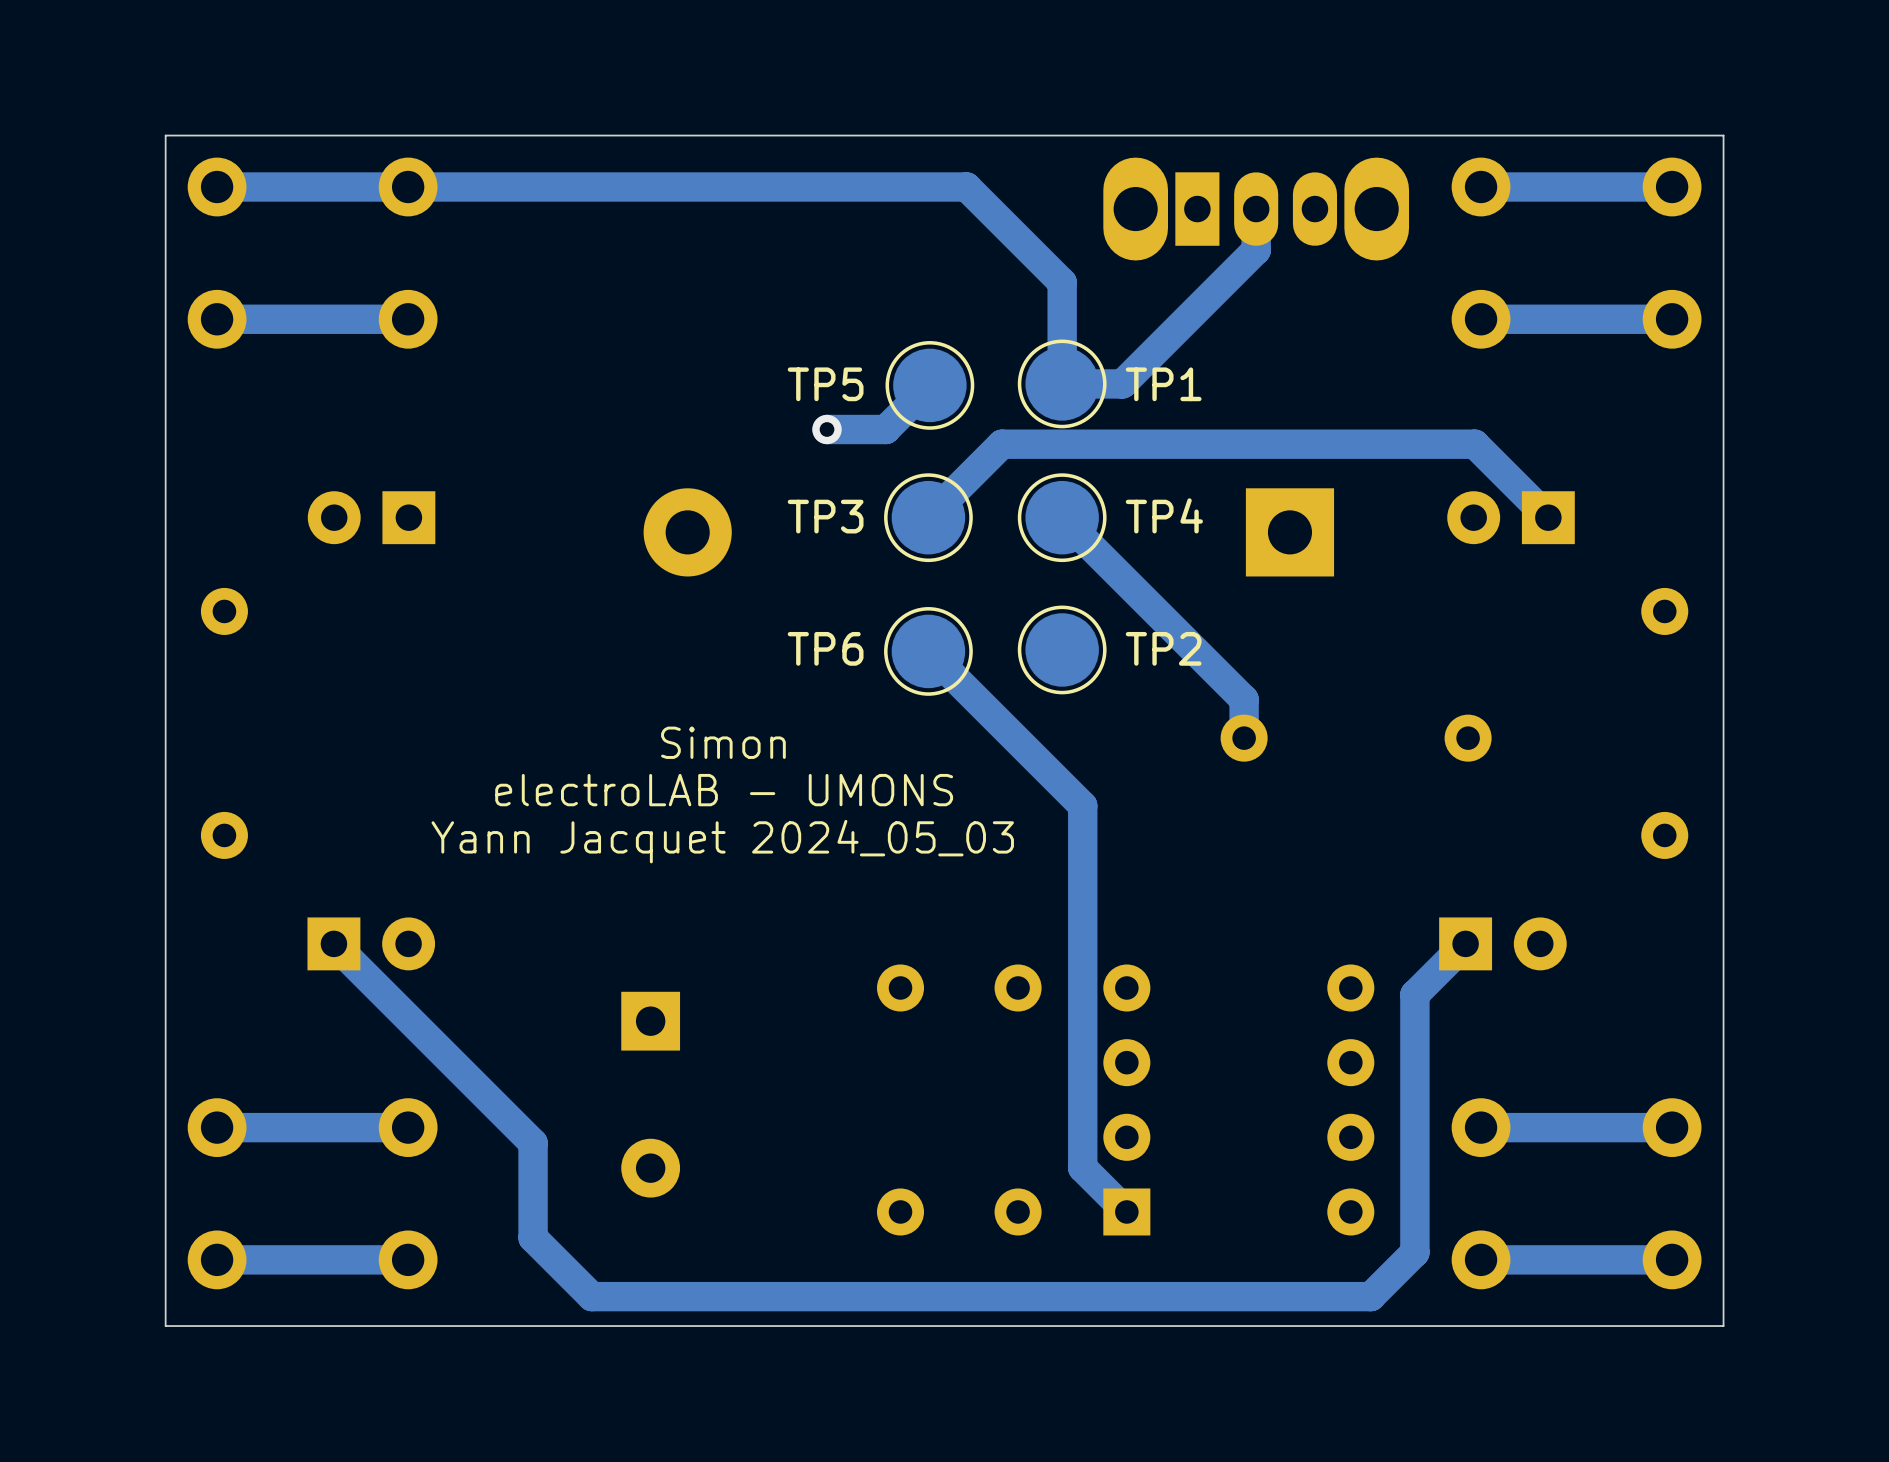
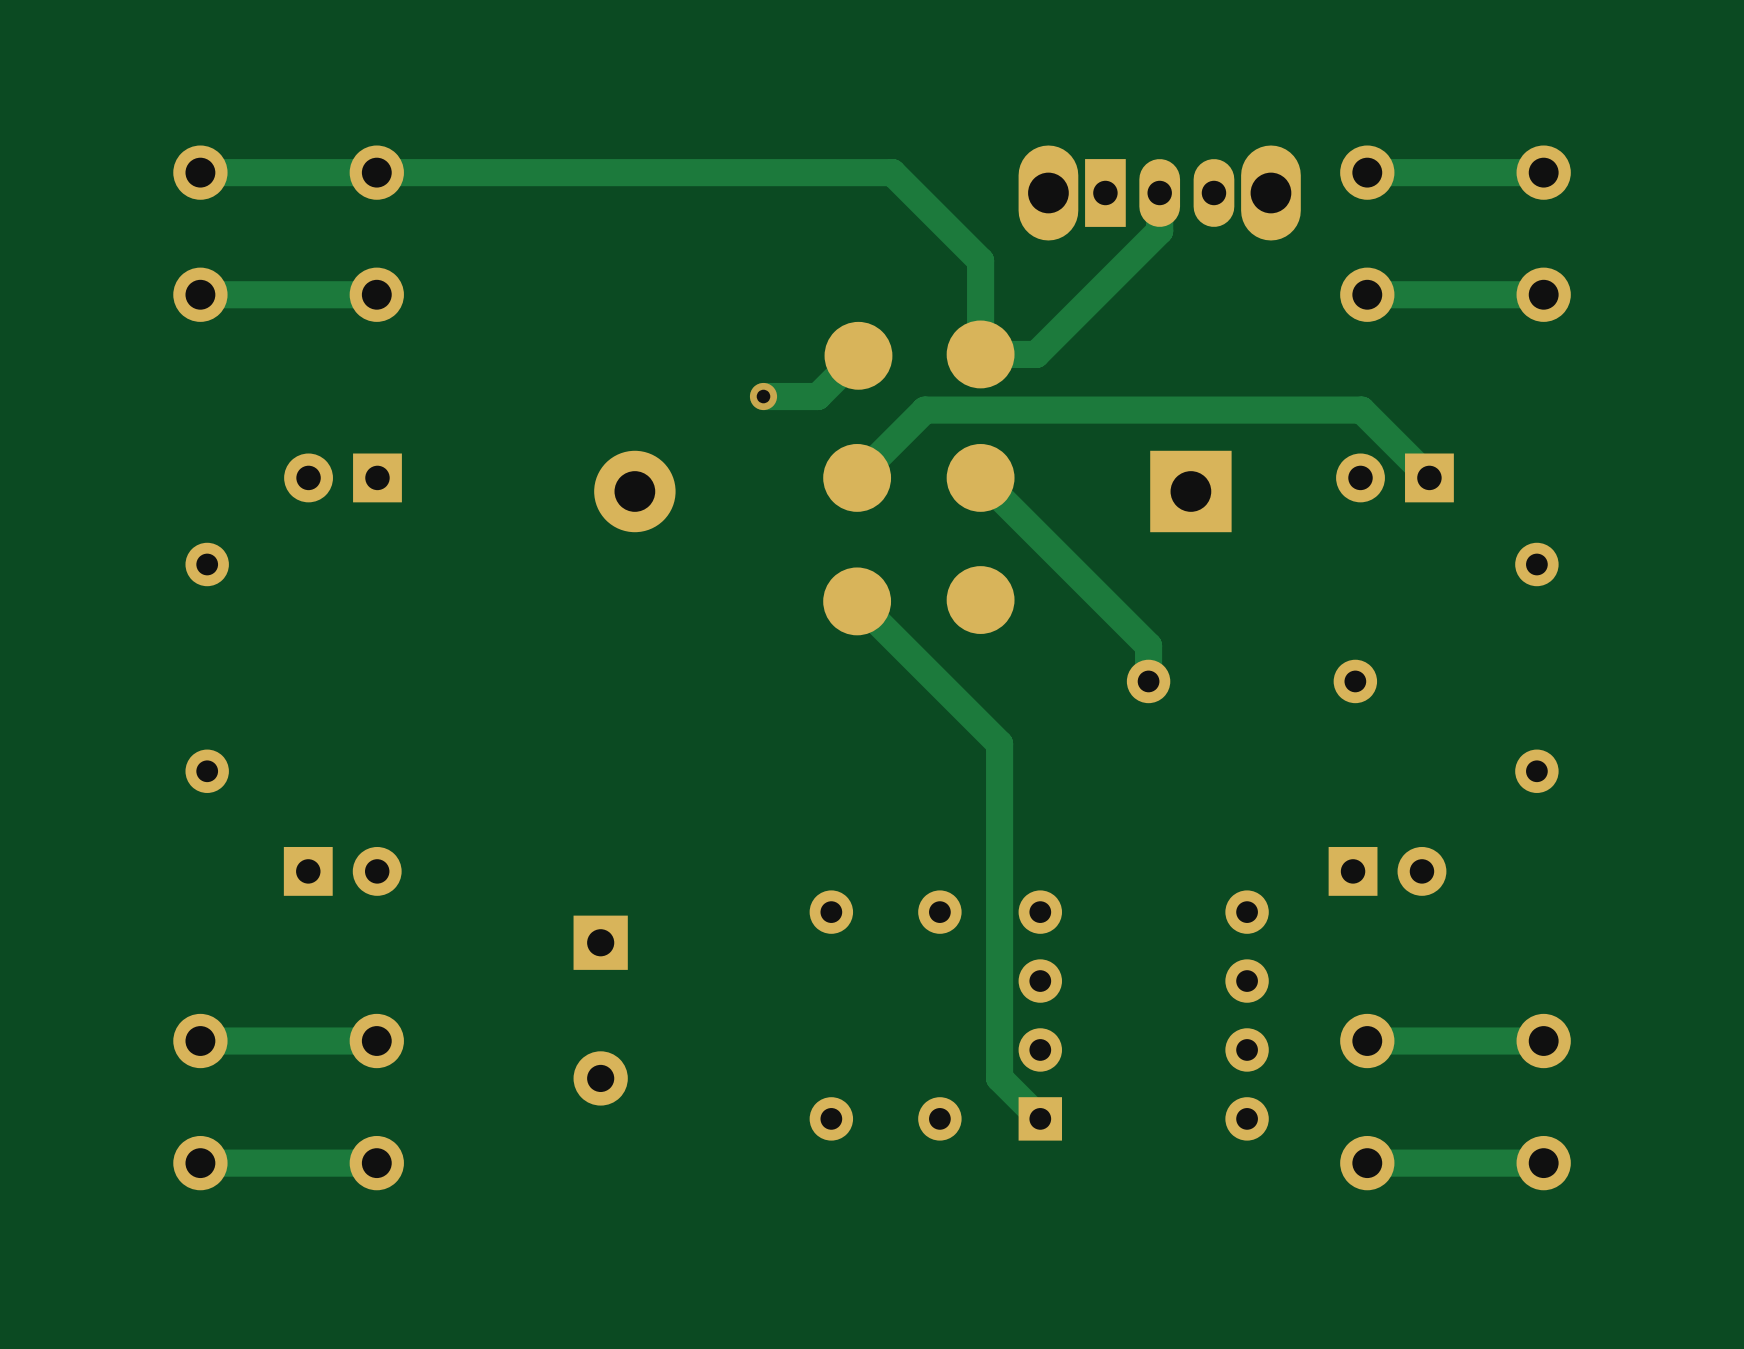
board edge: (1723, 135) (165, 135) (165, 1326) (1723, 1326) (1723, 135) -> none
TP5 side: bottom (1062, 383) -> top (980, 354)
TP1 side: bottom (929, 385) -> top (858, 355)
TP4 side: bottom (928, 517) -> top (857, 477)
TP3 side: bottom (1062, 517) -> top (980, 477)
TP6 side: bottom (1062, 649) -> top (980, 600)
TP2 side: bottom (928, 651) -> top (857, 601)
text: Simon (723, 742) -> none
text: electroLAB - UMONS (724, 790) -> none
text: Yann Jacquet 2024_05_03 (722, 841) -> none
track: (1465, 943) (1414, 994) (1414, 1252) (1370, 1296) (591, 1296) (533, 1237) (533, 1143) (333, 943) -> none

